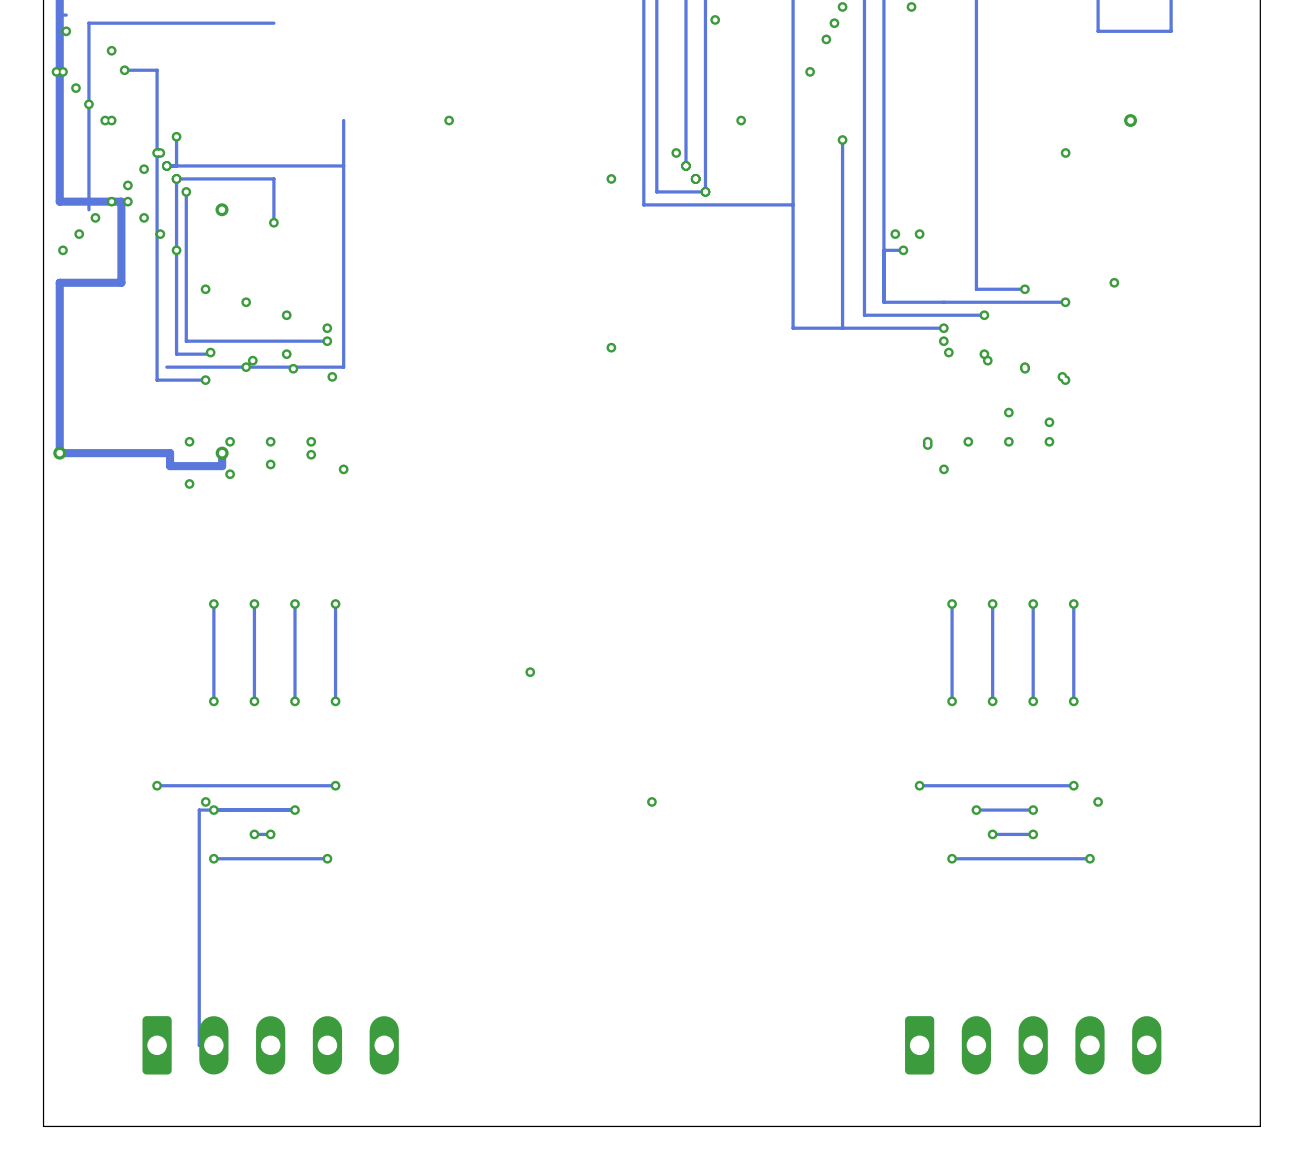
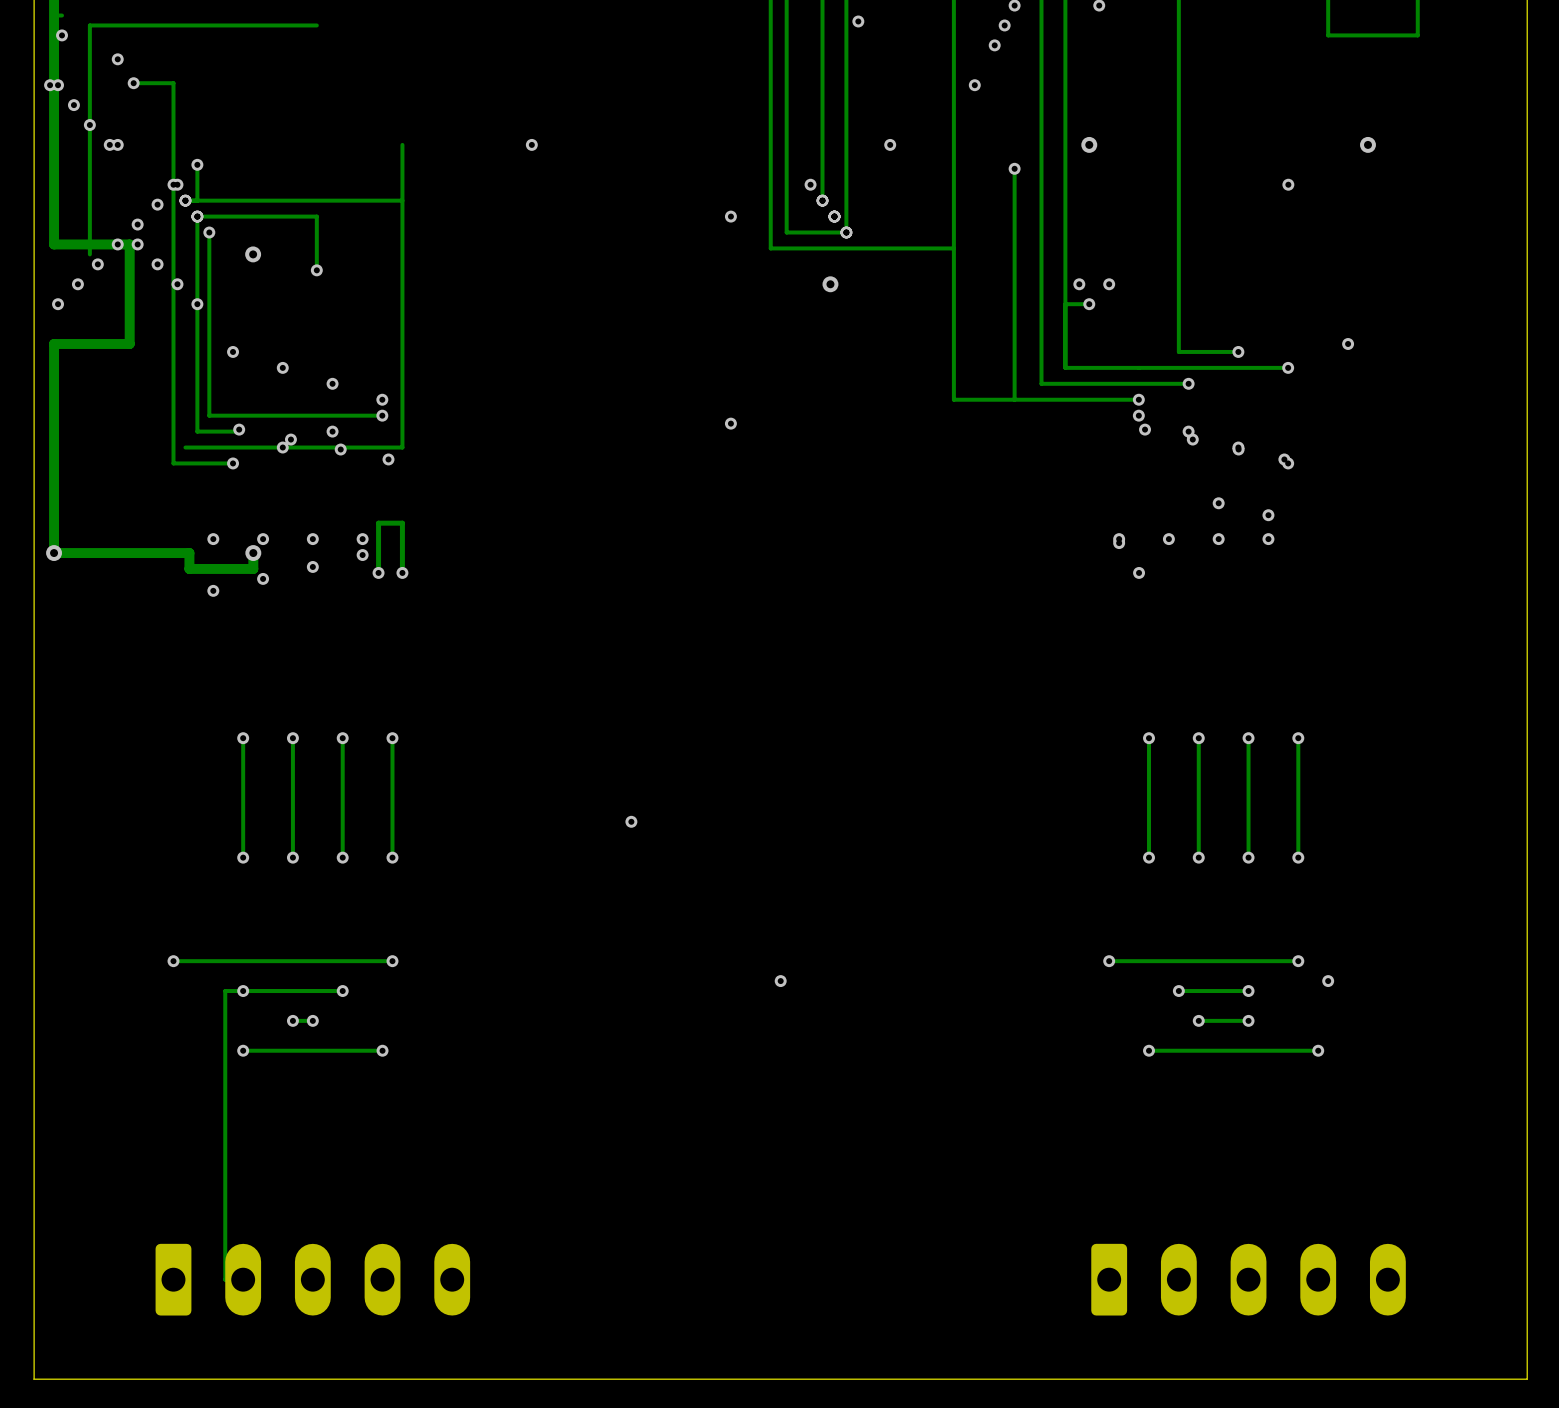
via: none -> (1089, 144)
via: none -> (830, 284)
via: none -> (378, 572)
track: none -> (402, 572) (402, 523) (378, 523) (378, 572)
via: (205, 801) -> none

